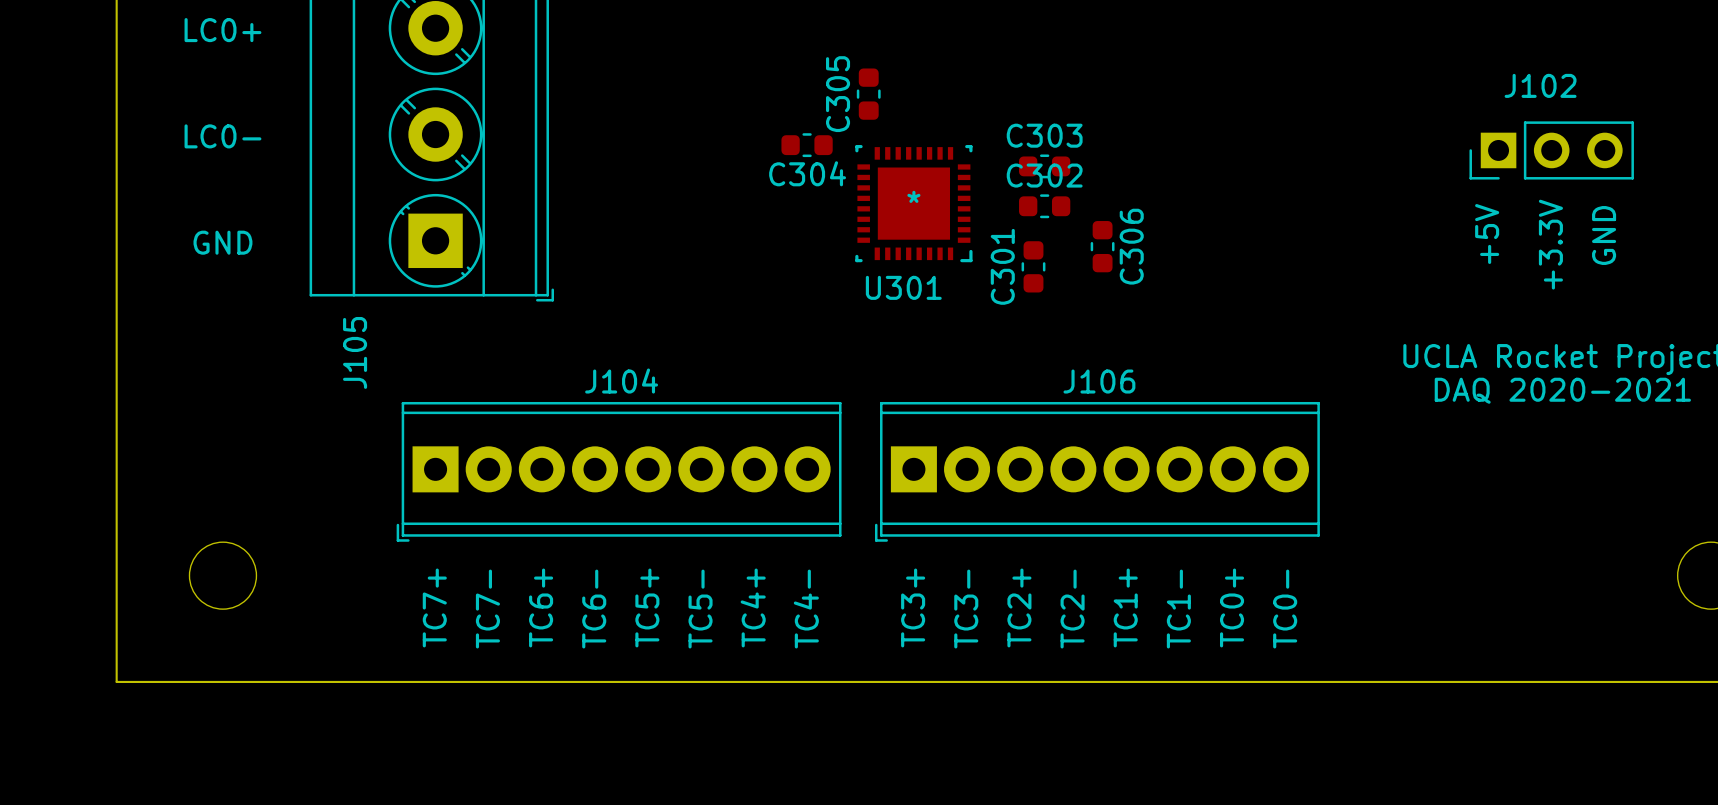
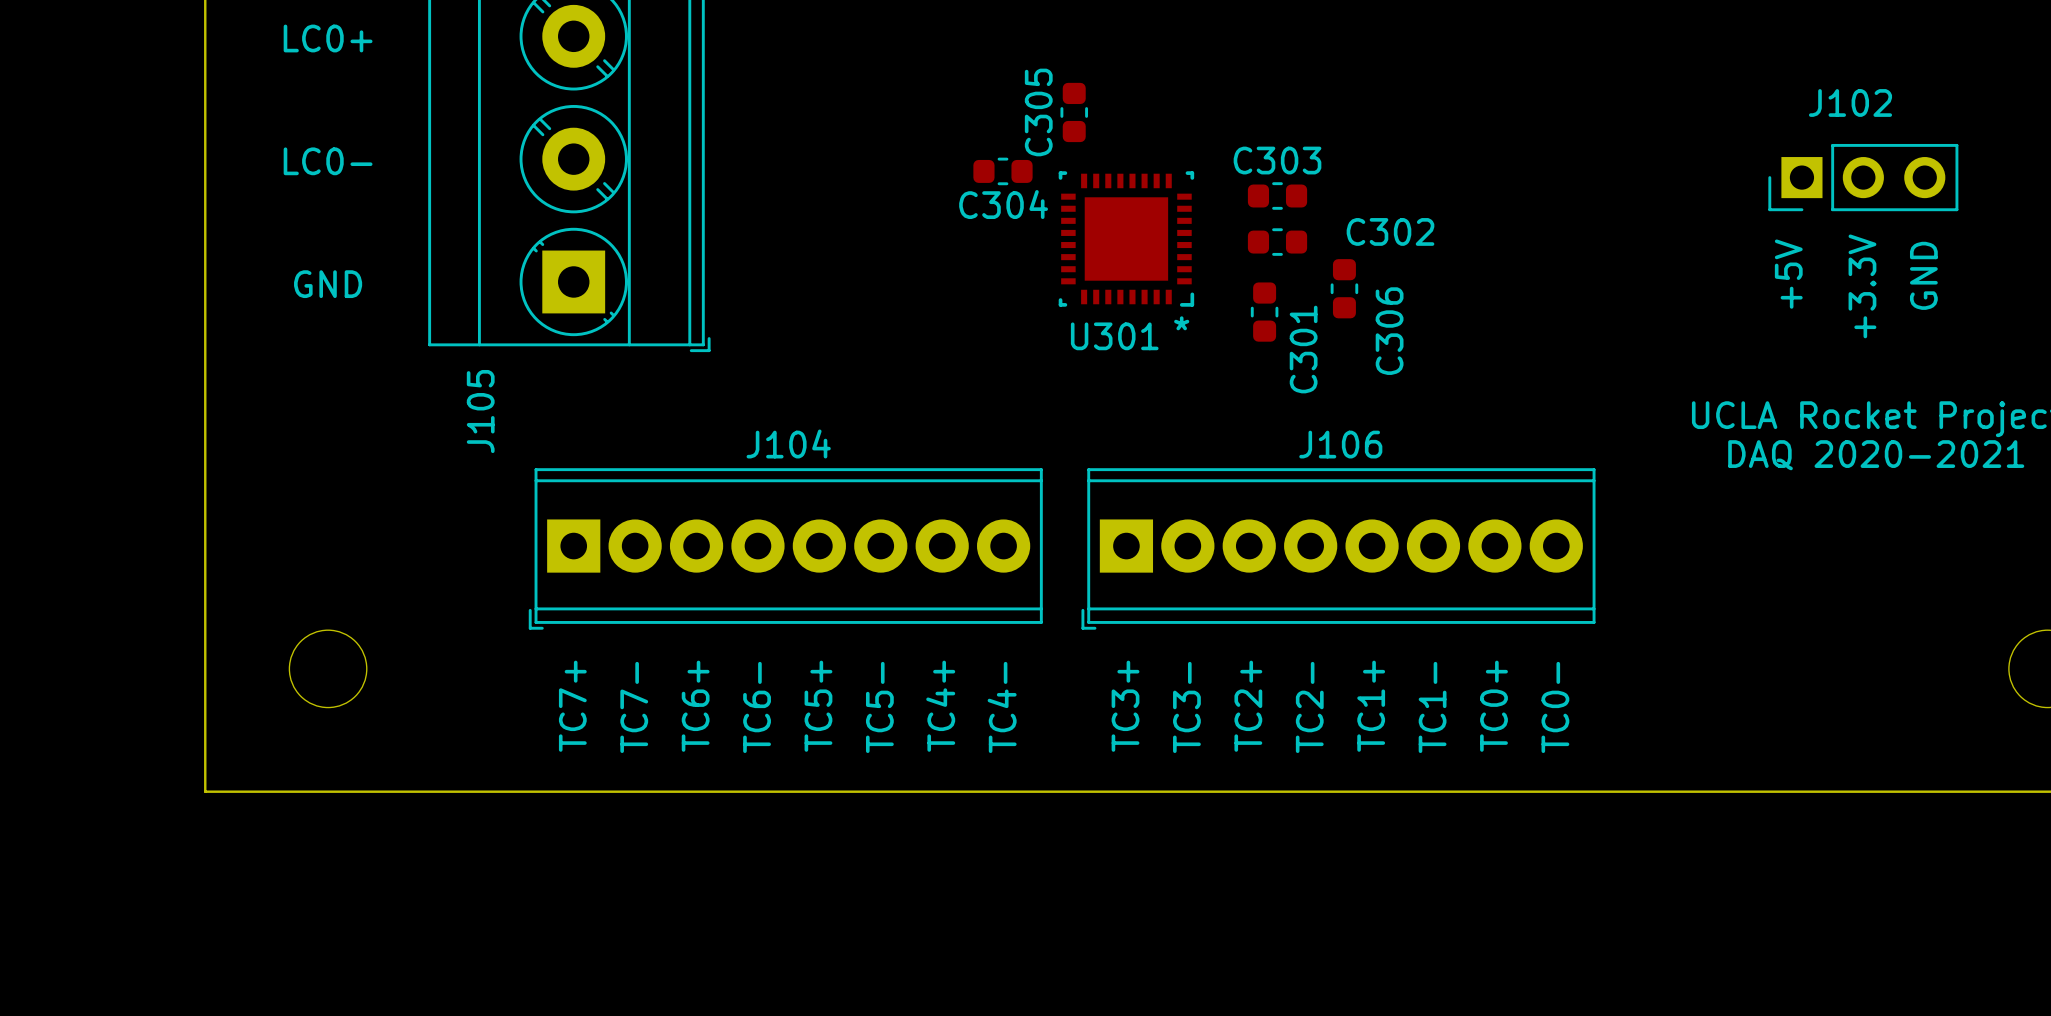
C302 name position: C302 (1044, 175) -> C302 (1390, 231)
U301 text position: * (913, 196) -> * (1181, 323)
C306 name position: C306 (1131, 246) -> C306 (1389, 331)
C301 name position: C301 (1002, 266) -> C301 (1303, 349)

